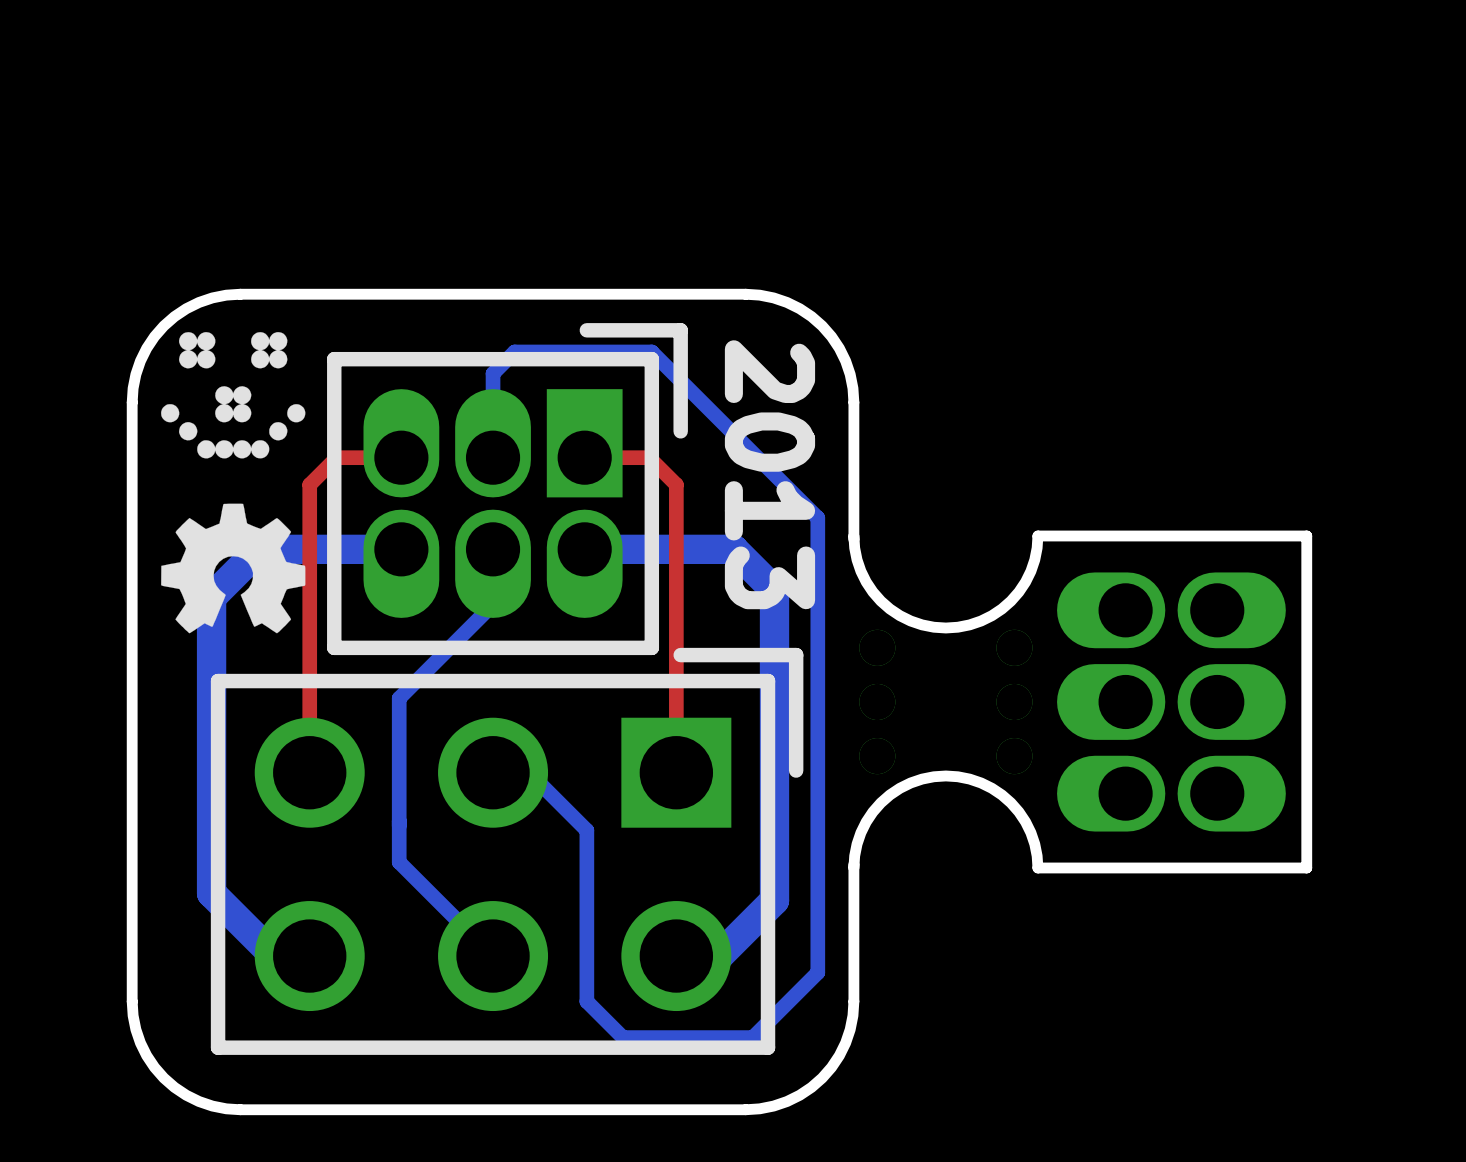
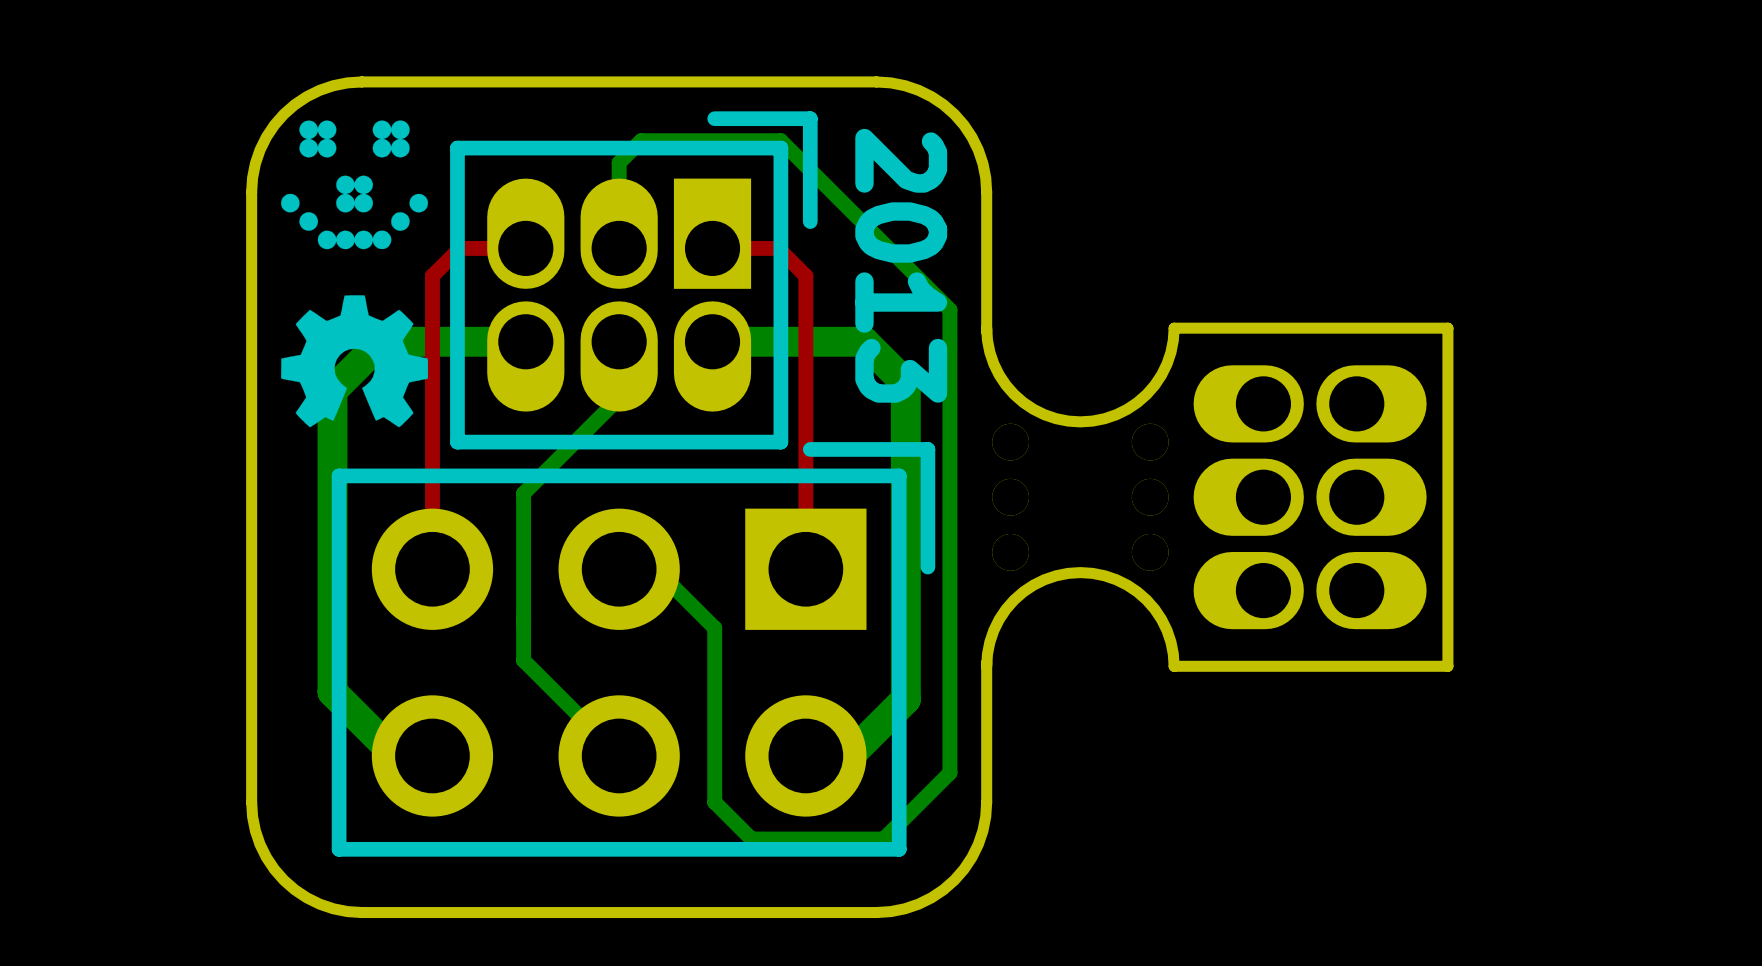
part footprint: [210, 647, 804, 1055] -> [331, 442, 936, 857]

